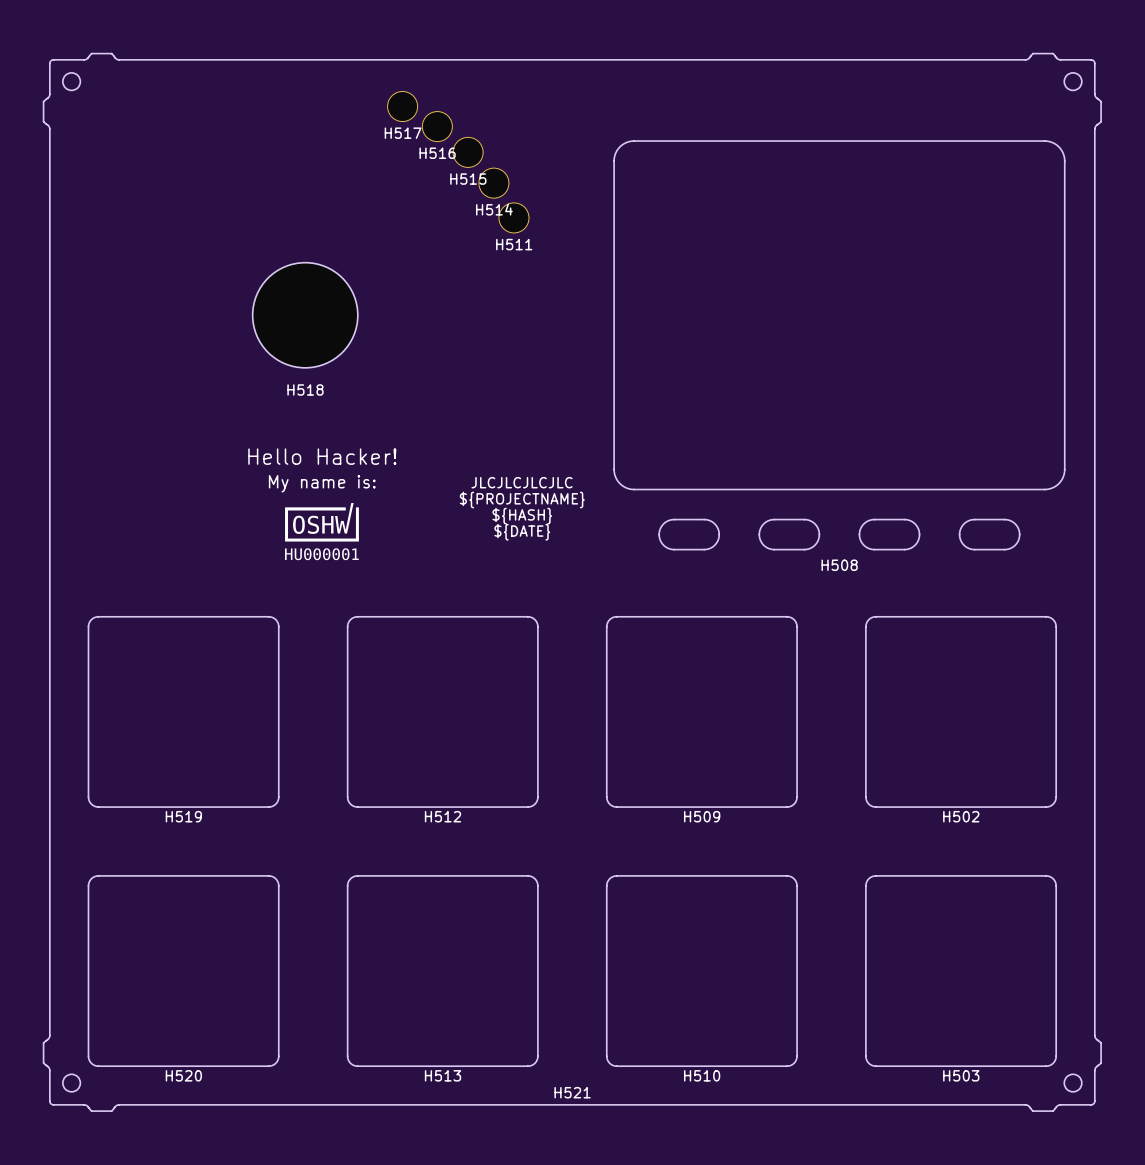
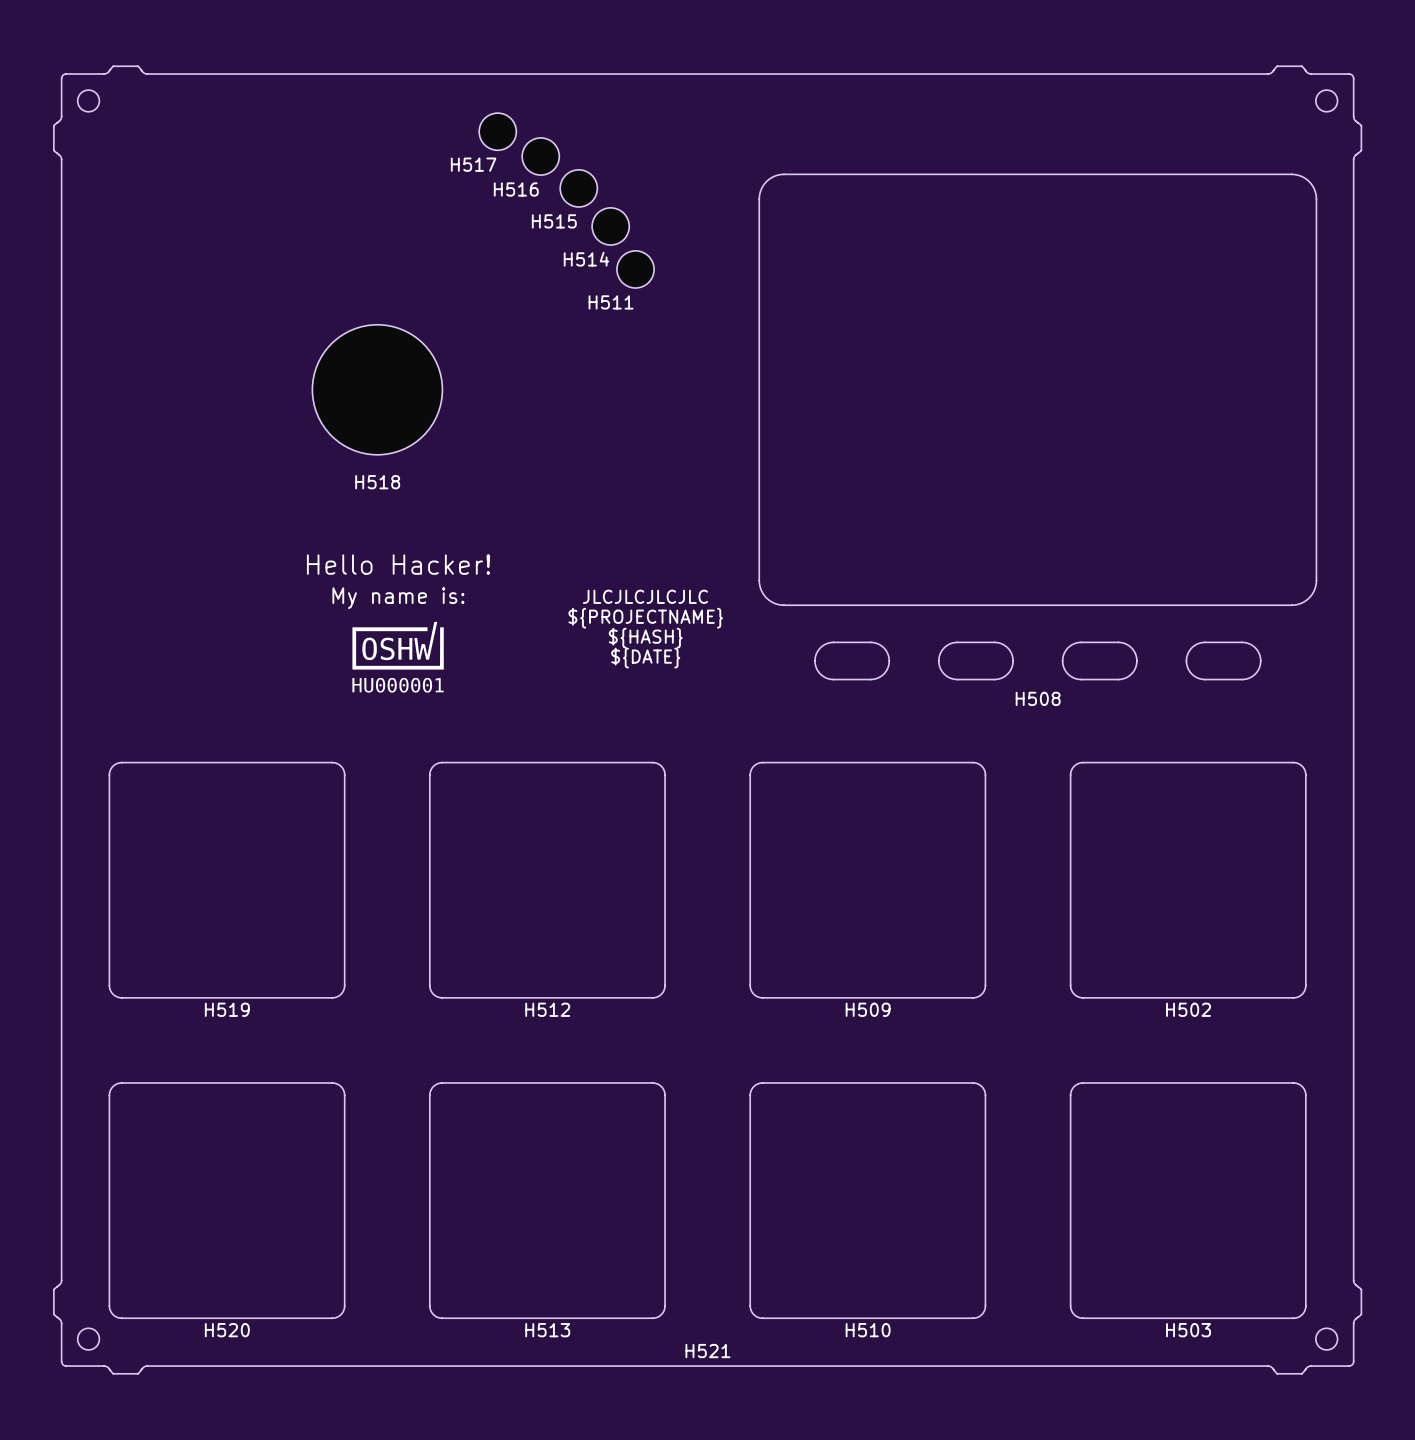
H517 footprint: [387, 90, 419, 123] -> [479, 113, 517, 151]
H516 footprint: [421, 111, 453, 143] -> [522, 137, 560, 176]
H515 footprint: [452, 136, 484, 168] -> [560, 169, 598, 208]
H514 footprint: [478, 167, 510, 199] -> [592, 207, 630, 246]
H511 footprint: [498, 202, 530, 234] -> [616, 250, 655, 289]

